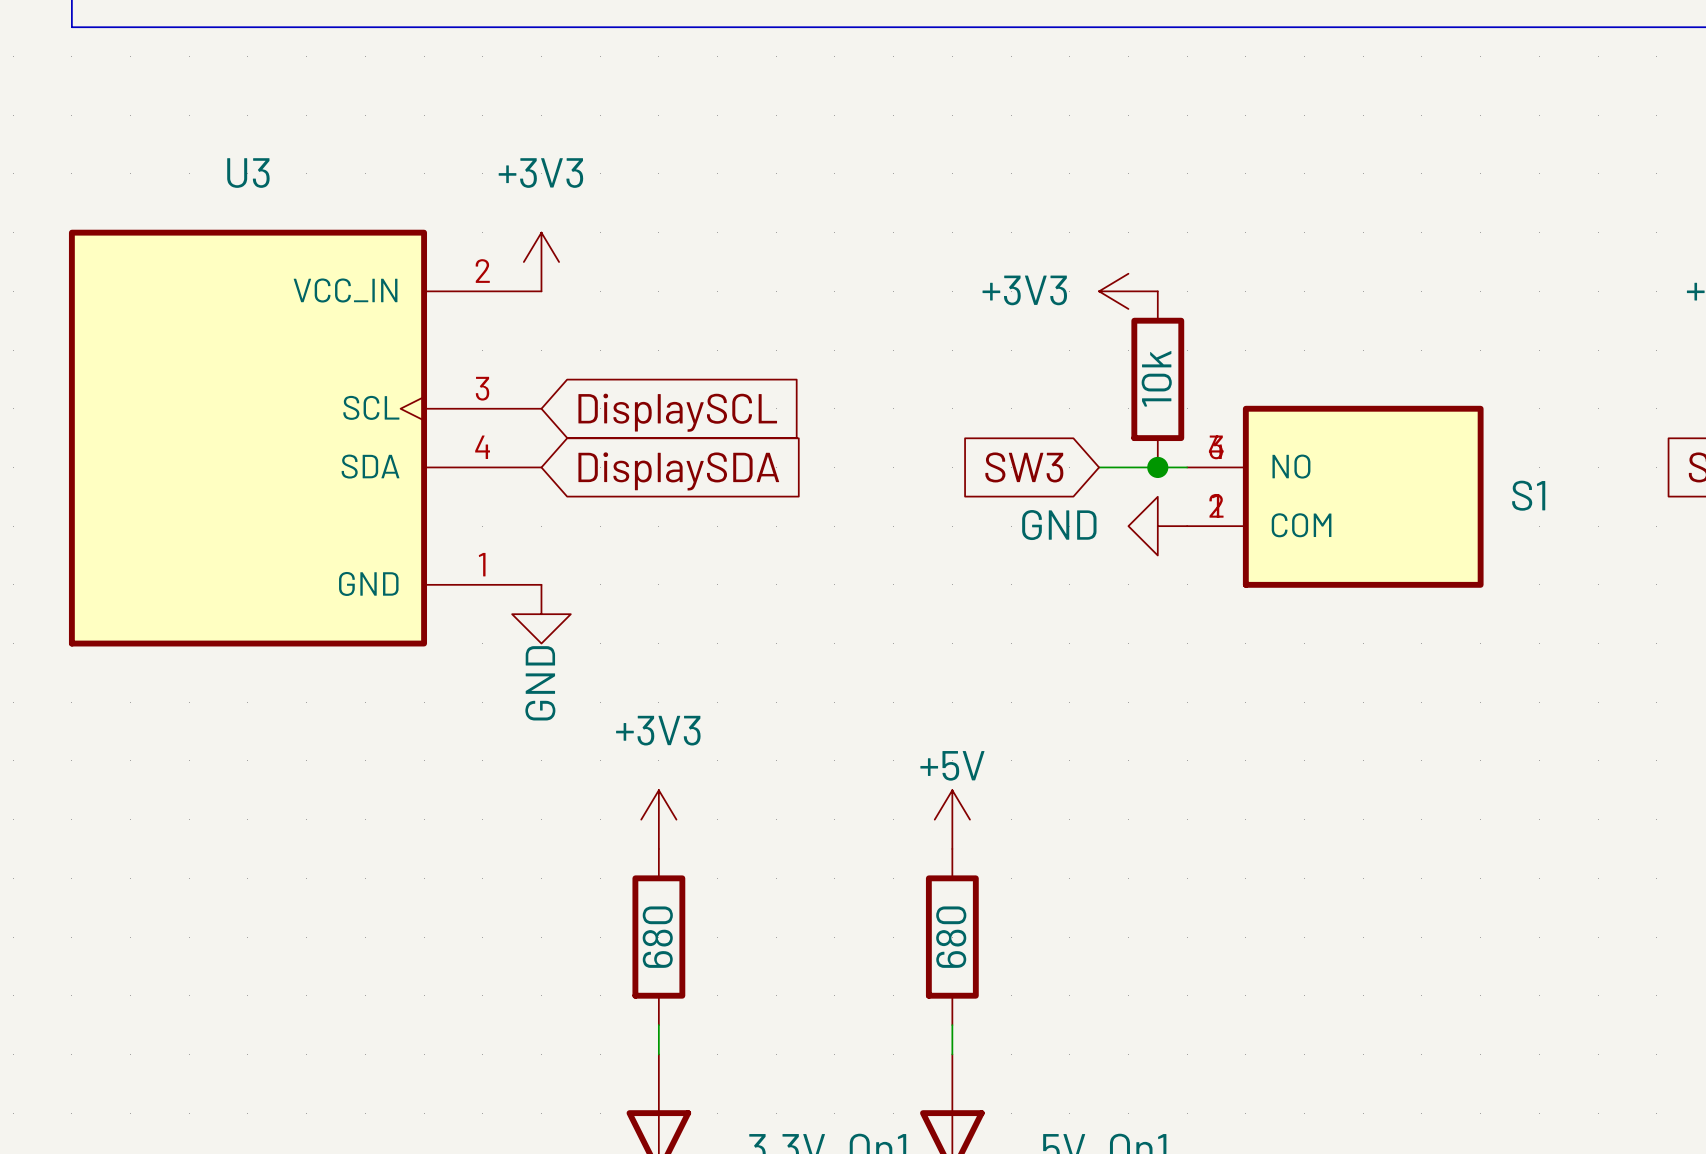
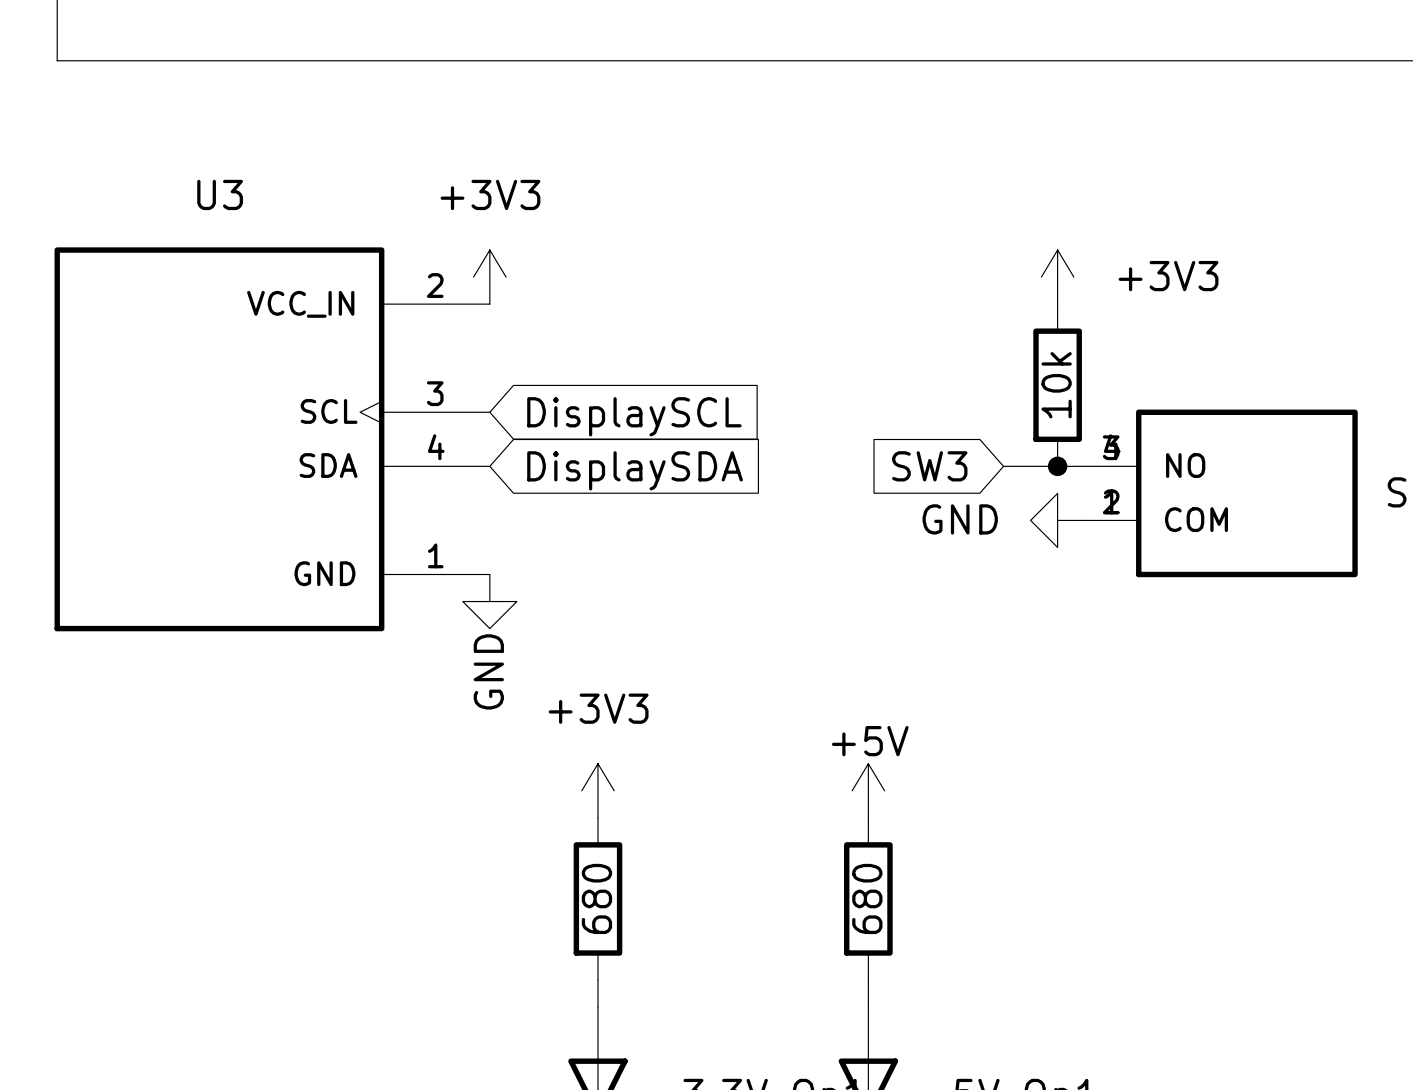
power symbol text position: +3V3 (1024, 290) -> +3V3 (1168, 276)
power symbol rotation: 0° (1128, 291) -> 90° clockwise (1057, 277)
power symbol position: +3V3 (1128, 291) -> +3V3 (1057, 277)

